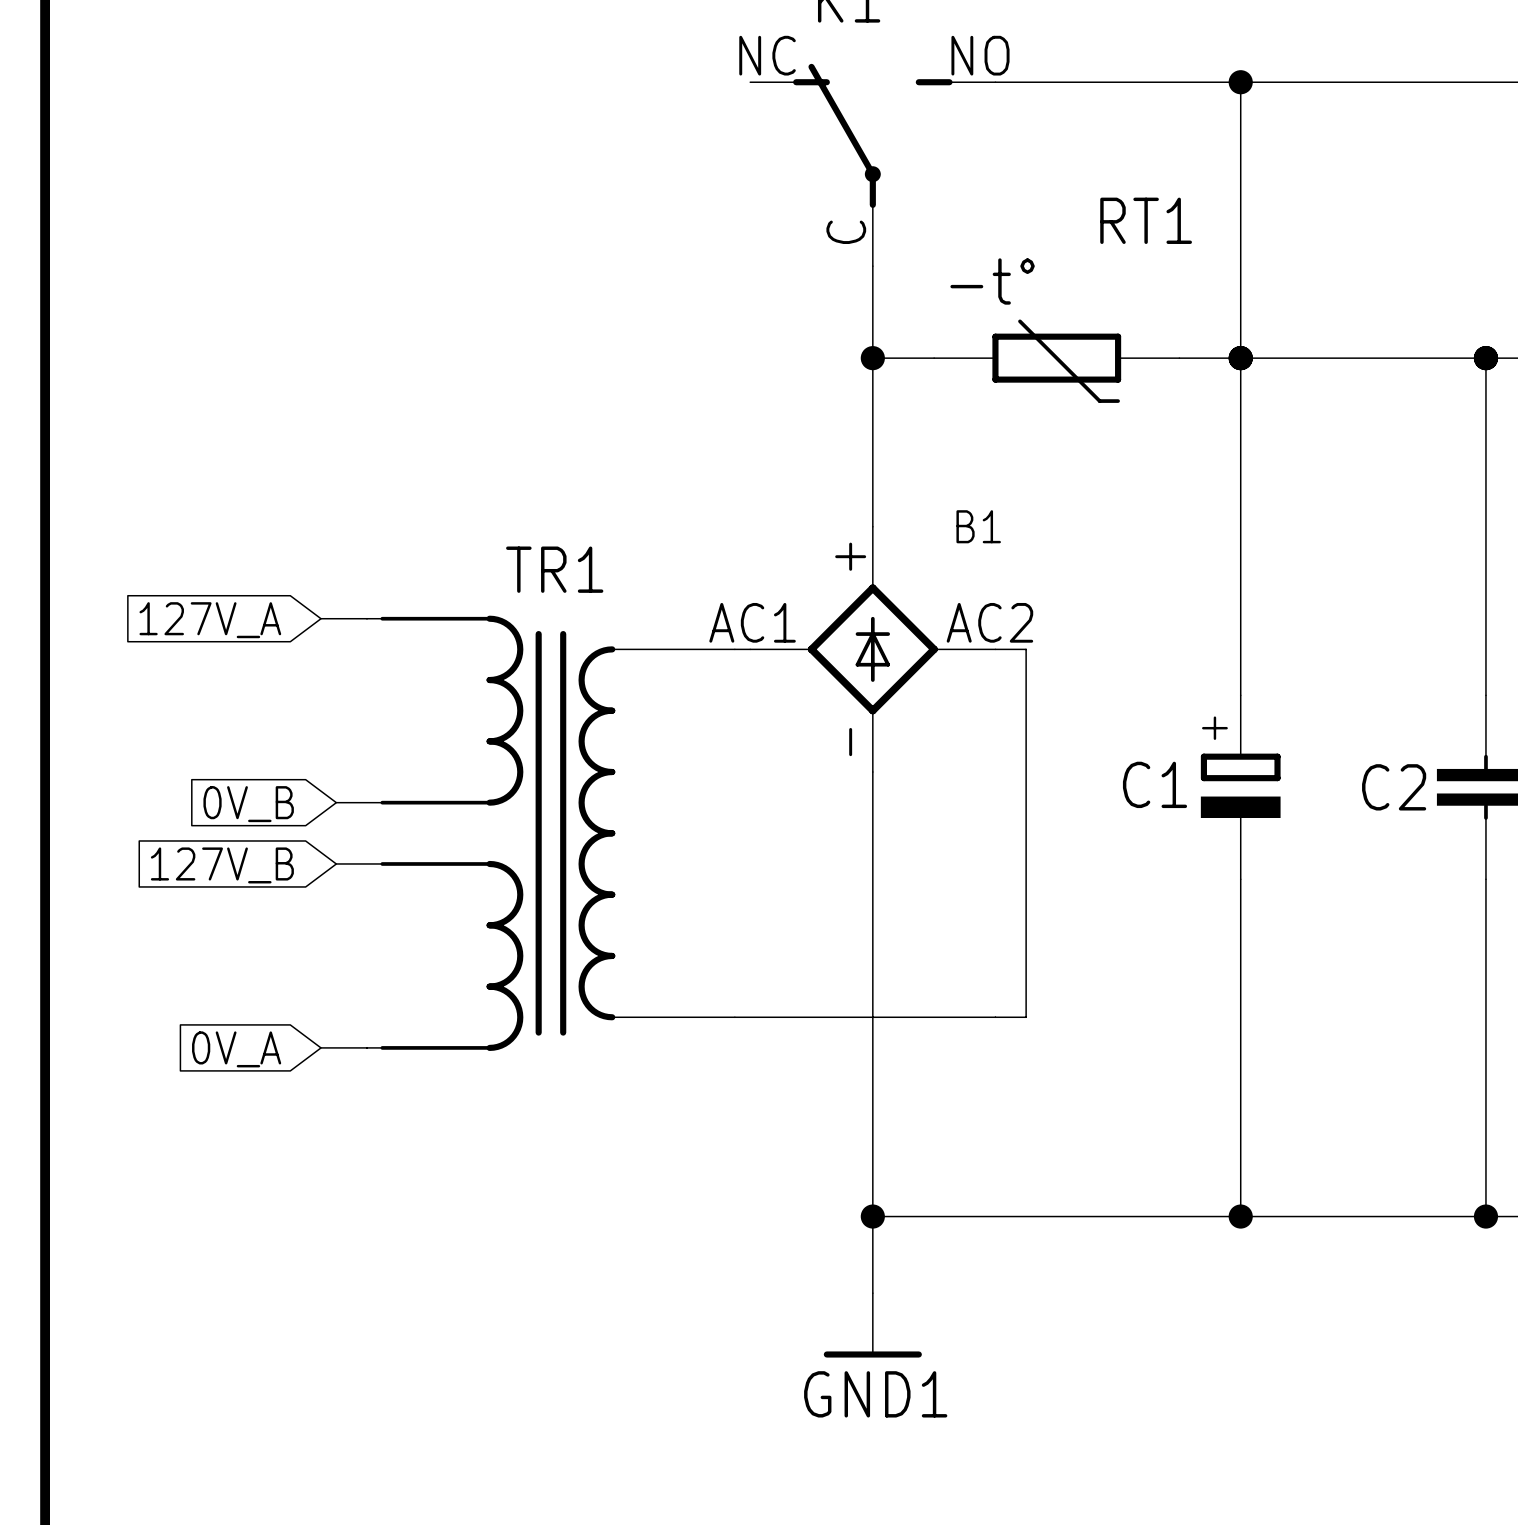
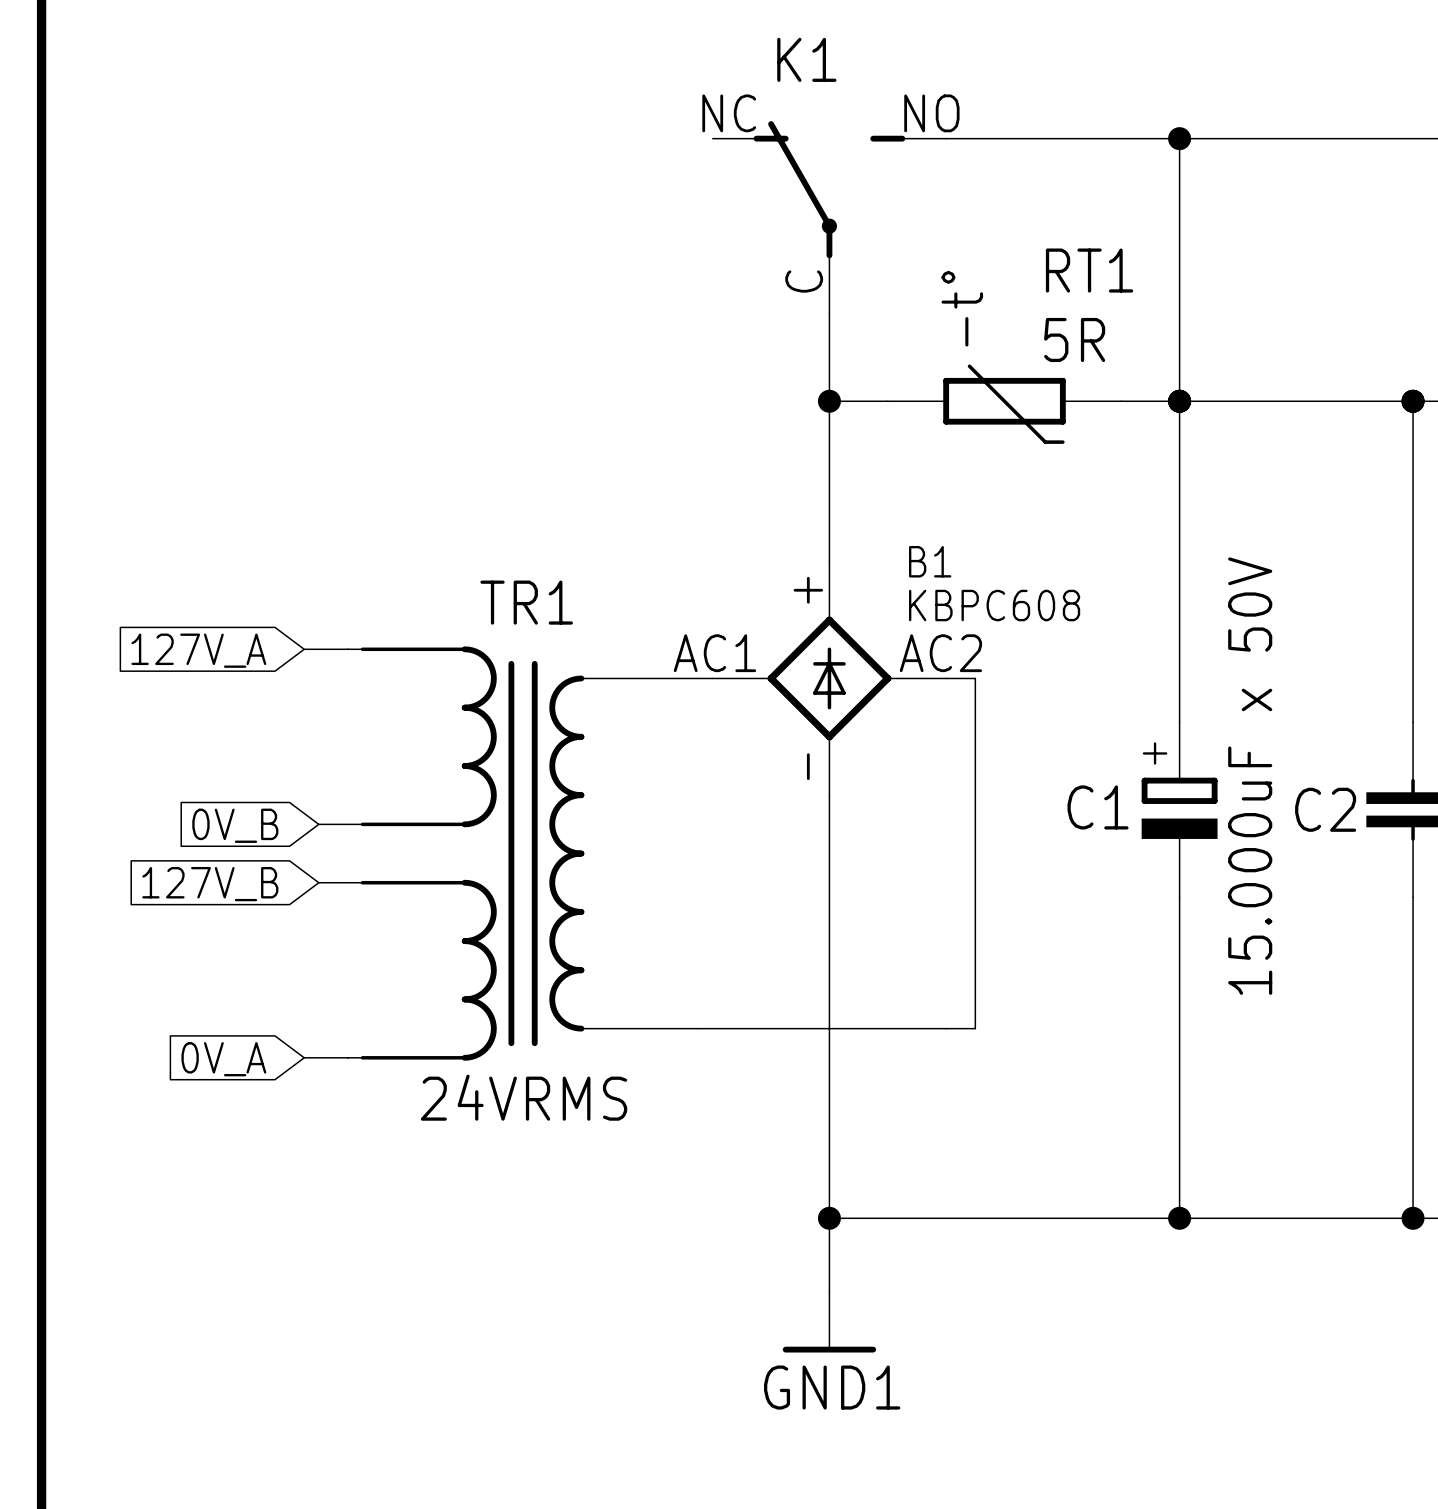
RT1 text rotation: 0° (992, 281) -> 90° counterclockwise (962, 308)
RT1 value: none -> 5R (1074, 339)
B1 value: none -> KBPC608 (994, 605)
C1 value: none -> 15.000uF x 50V (1250, 776)
TR1 value: none -> 24VRMS (524, 1097)

